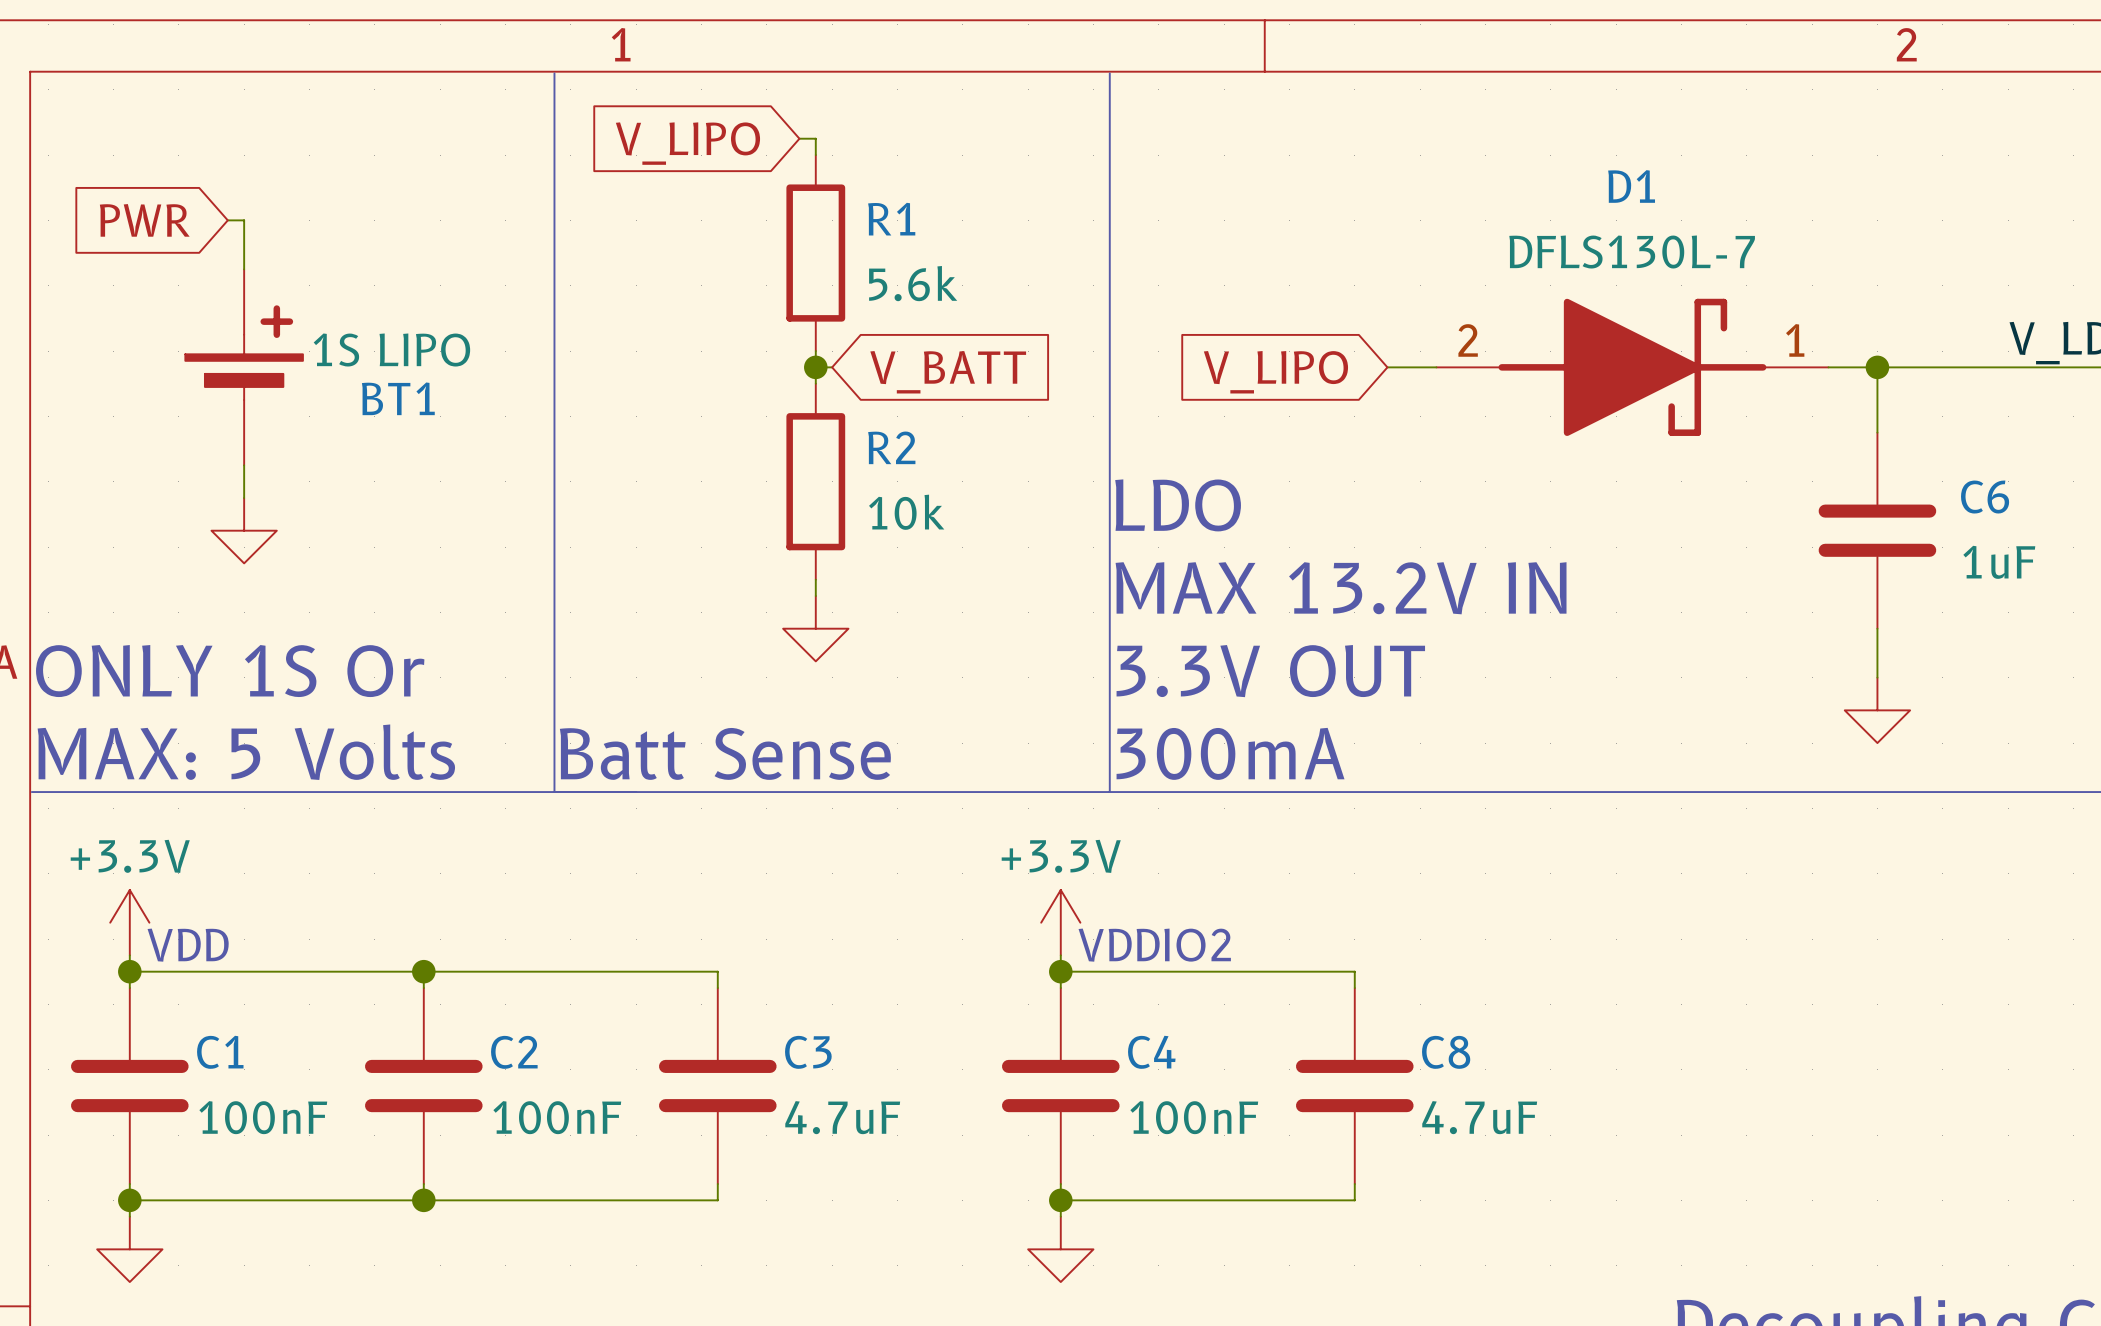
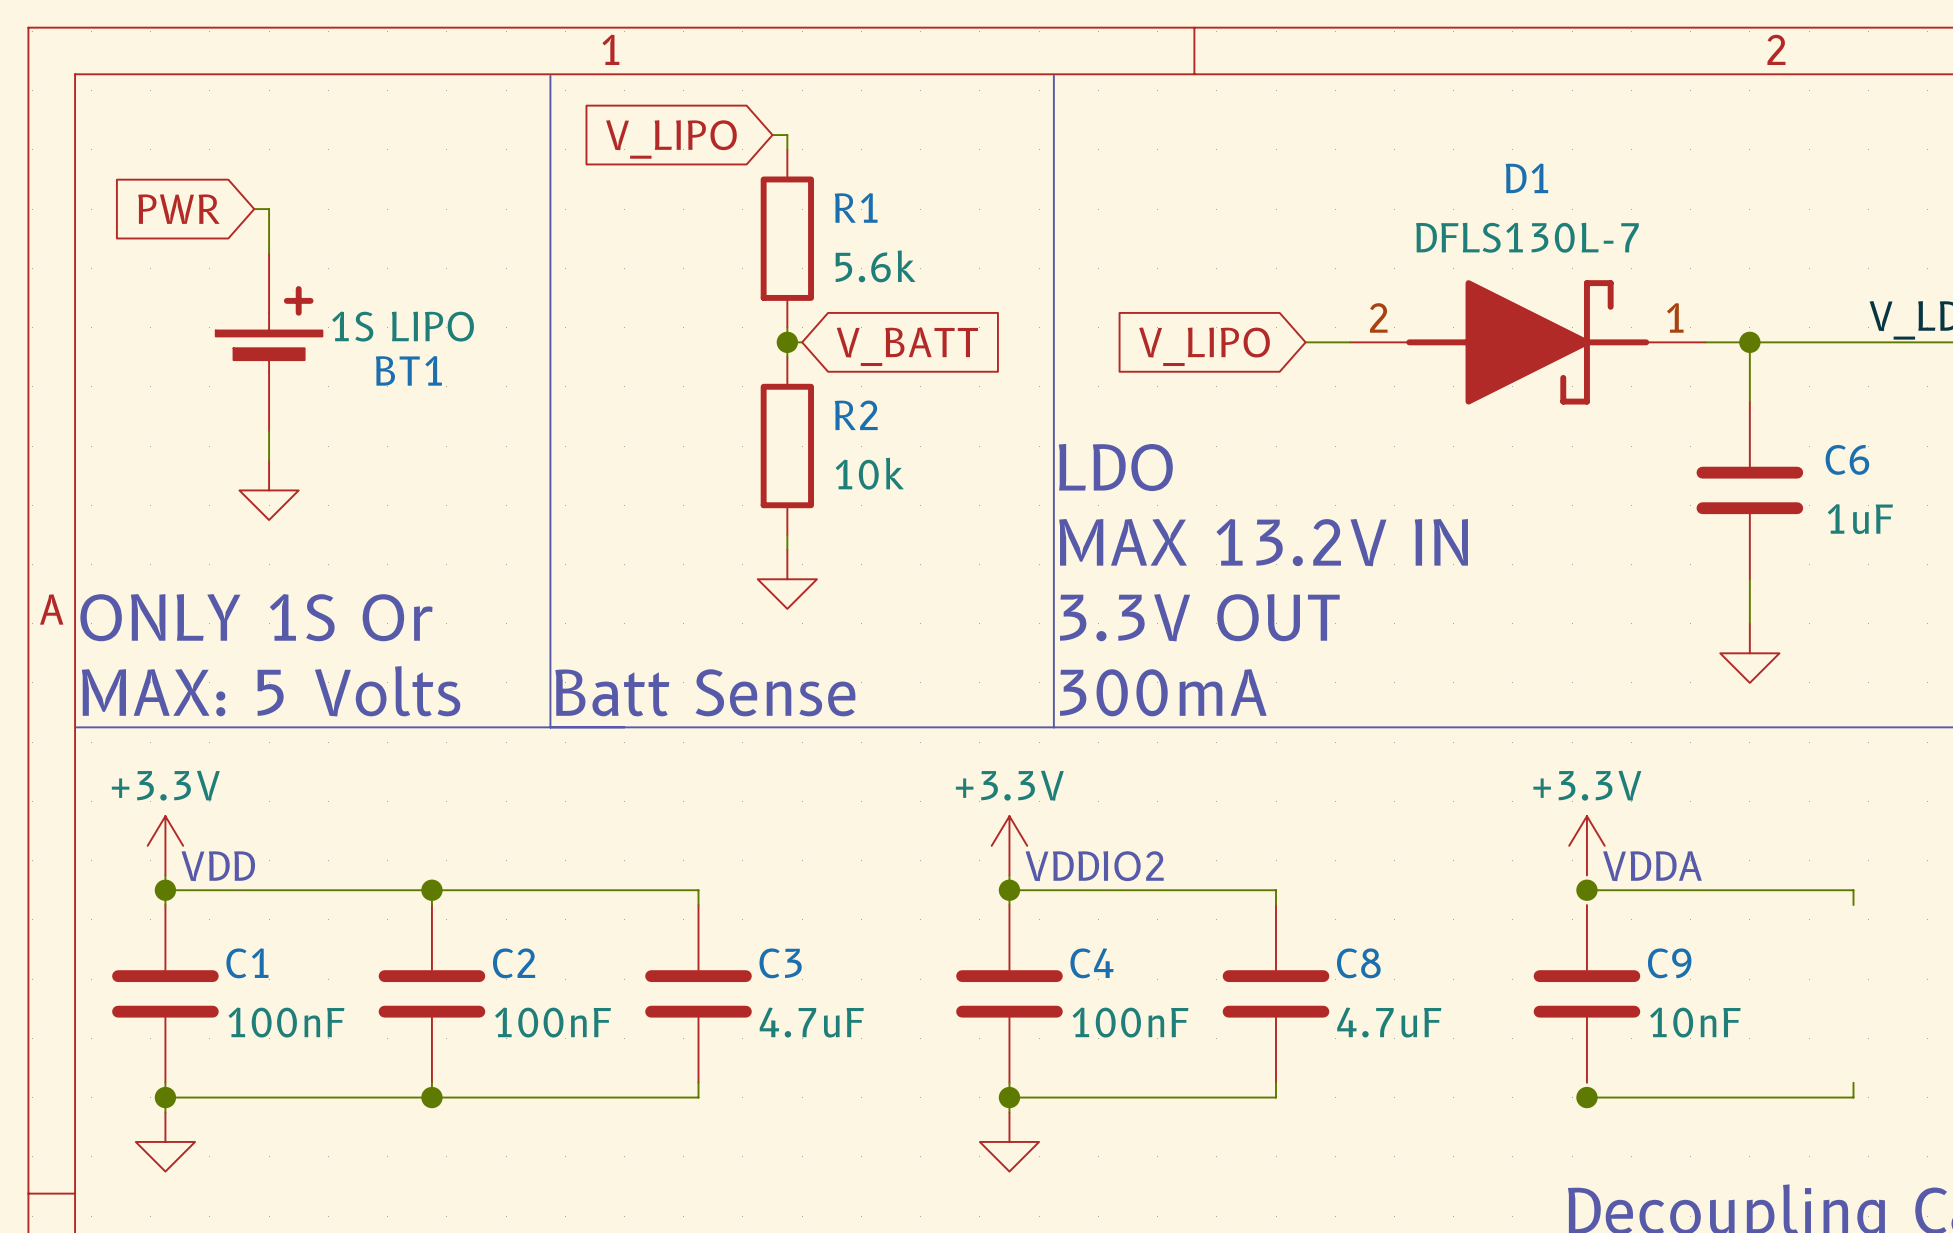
power symbol: none -> +3.3V (1586, 845)
text: none -> VDDA (1652, 866)
wire: none -> (1586, 890) (1853, 890) (1853, 905)
junction: none -> (1586, 890)
C9: none -> 10nF (1586, 993)
wire: none -> (1853, 1082) (1853, 1097) (1586, 1097)
junction: none -> (1586, 1097)

